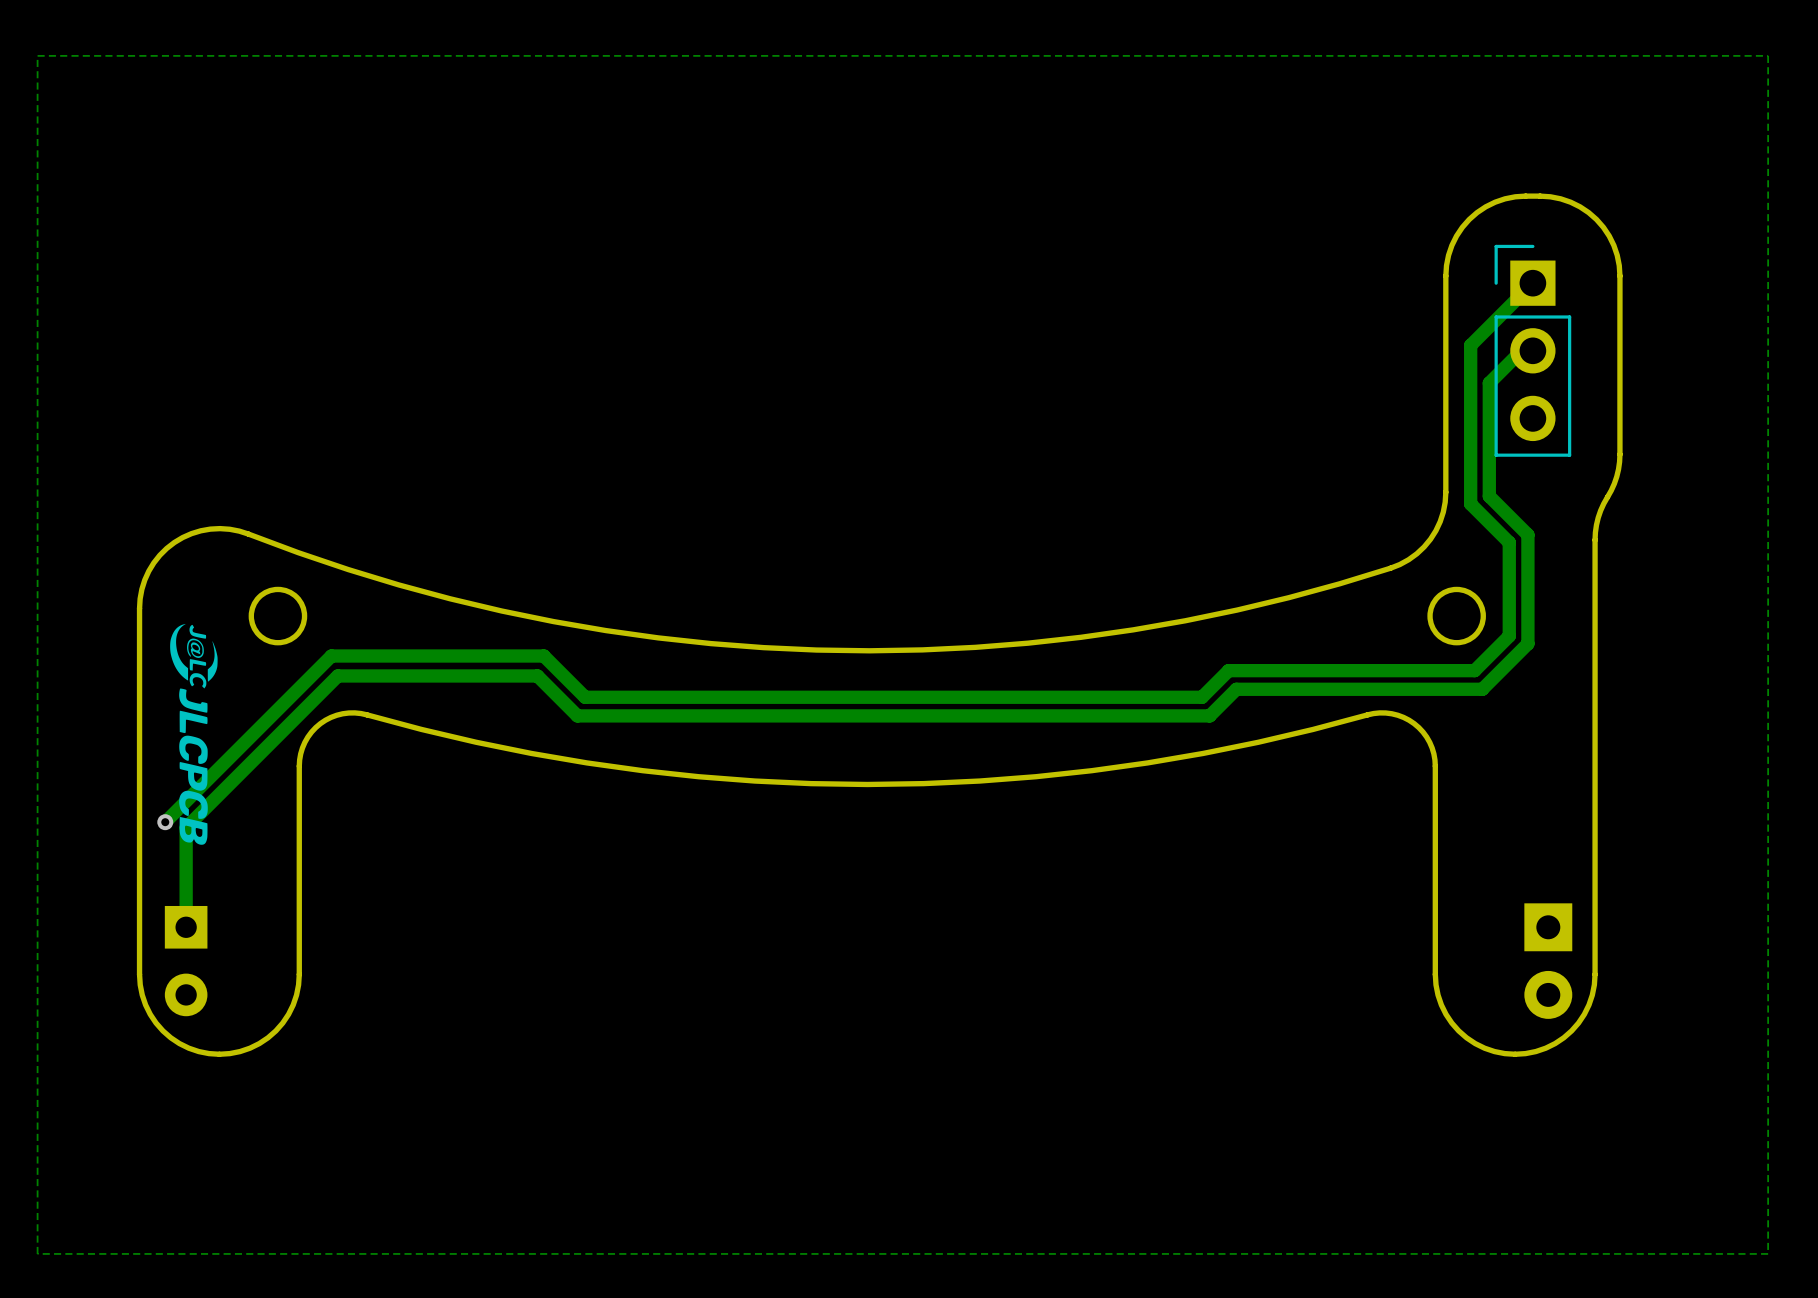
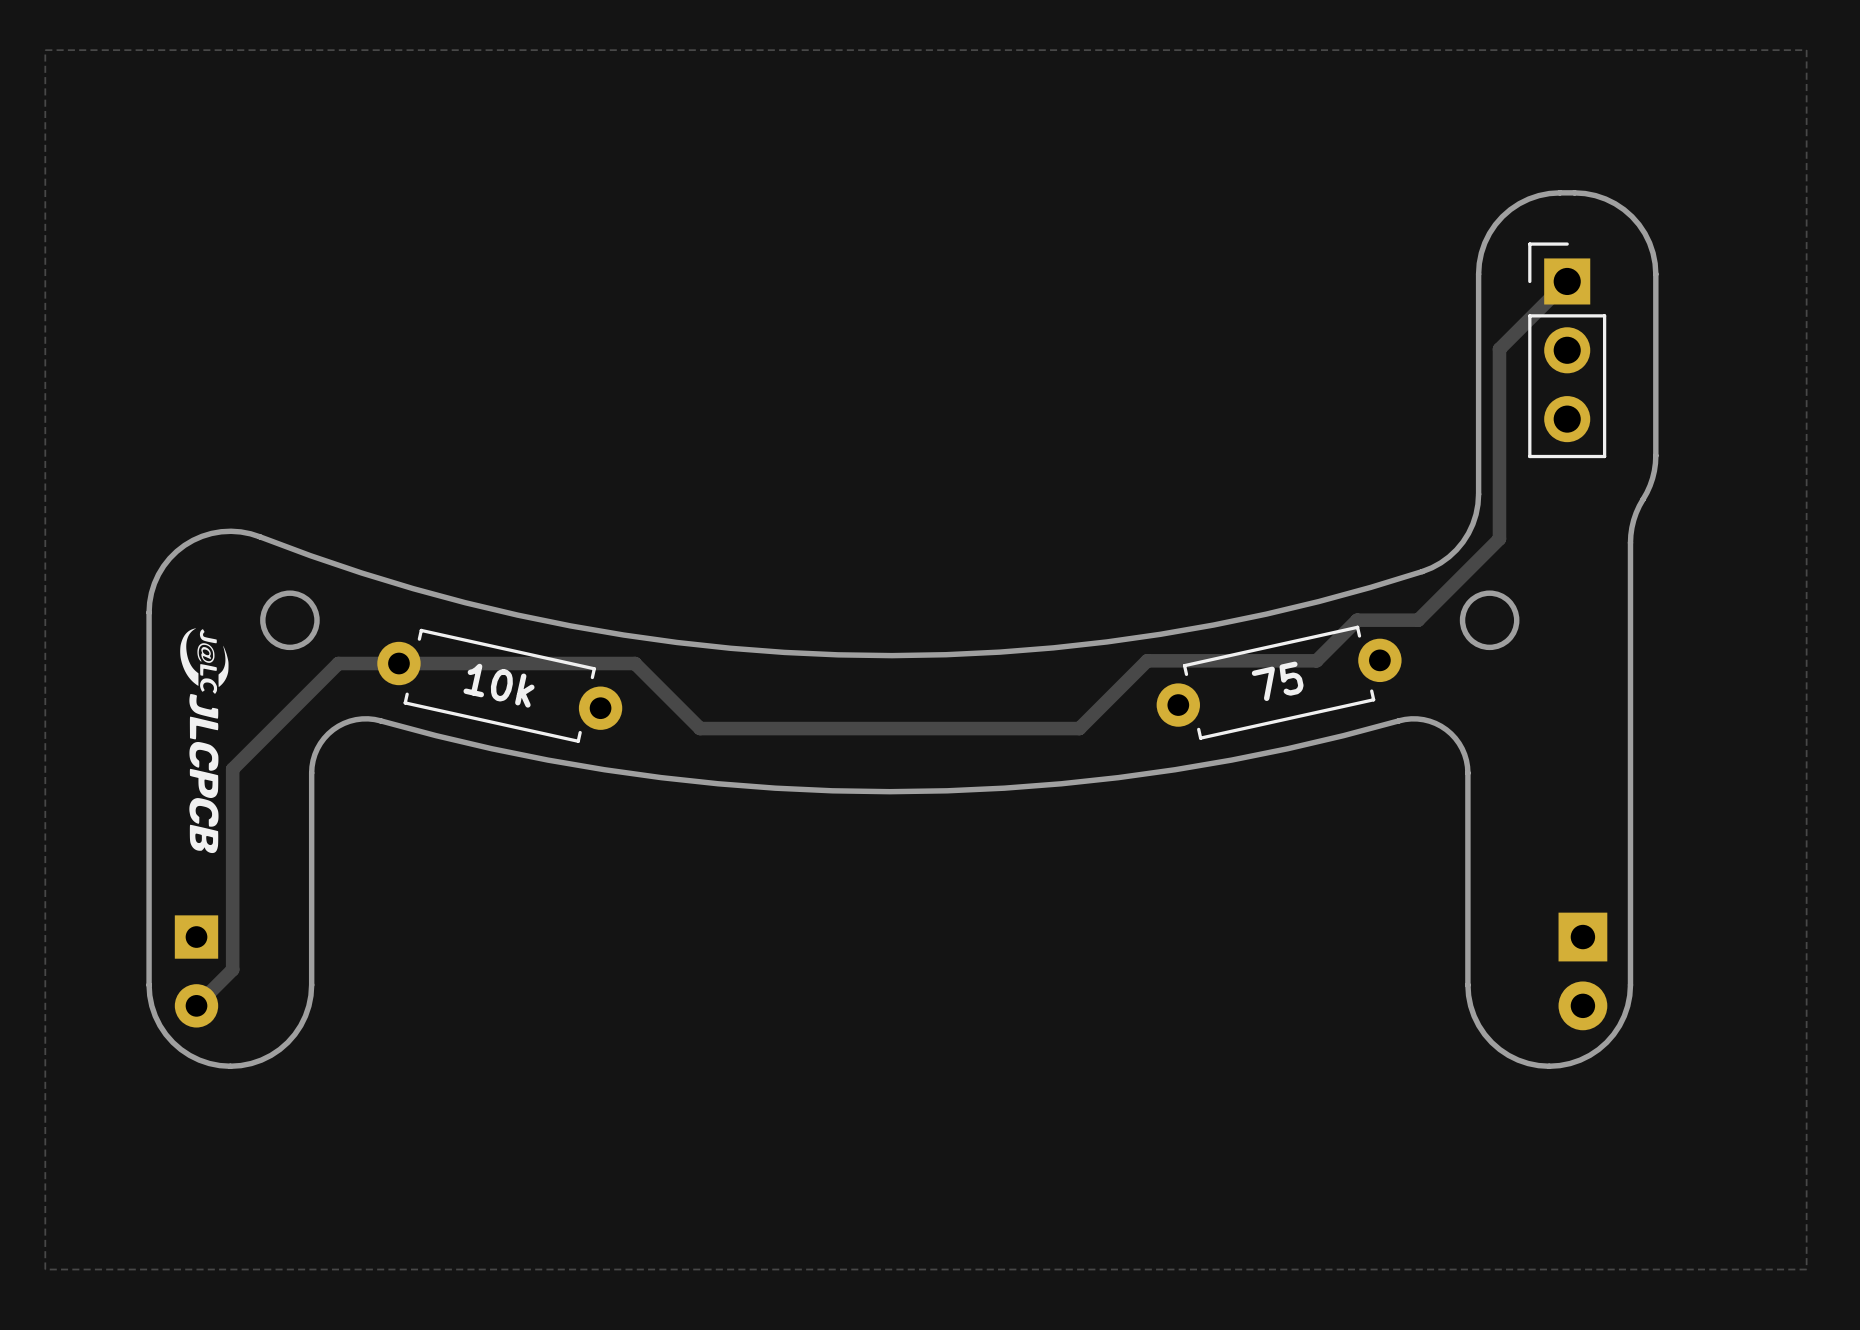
track: (1470, 345) (1470, 503) (1509, 542) (1509, 636) (1474, 670) (1228, 670) (1202, 697) (585, 697) (543, 656) (331, 656) (165, 822) -> (1503, 344) (1499, 349) (1499, 538) (1418, 620) (1357, 620) (1316, 660) (1147, 660) (1079, 728) (700, 728) (635, 663) (338, 663) (232, 769) (232, 969) (196, 1005)
track: (1532, 350) (1521, 350) (1489, 383) (1489, 496) (1527, 534) (1527, 643) (1482, 689) (1236, 689) (1209, 715) (577, 715) (537, 675) (337, 675) (186, 827) (186, 927) -> none
part: none -> 75 (1279, 682)
part: none -> 10k (499, 685)
via: (165, 822) -> none

